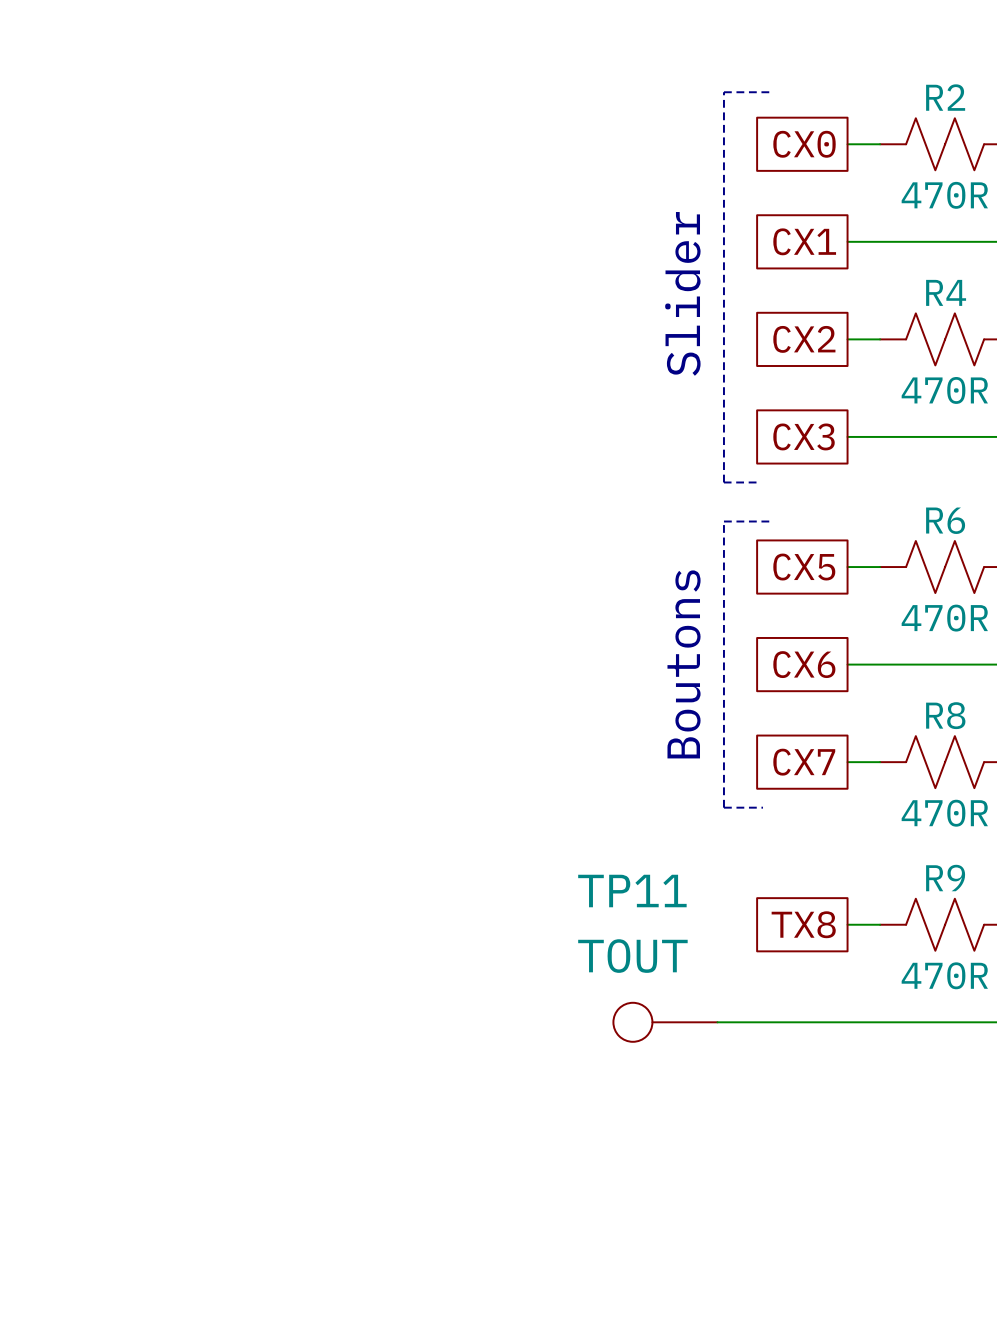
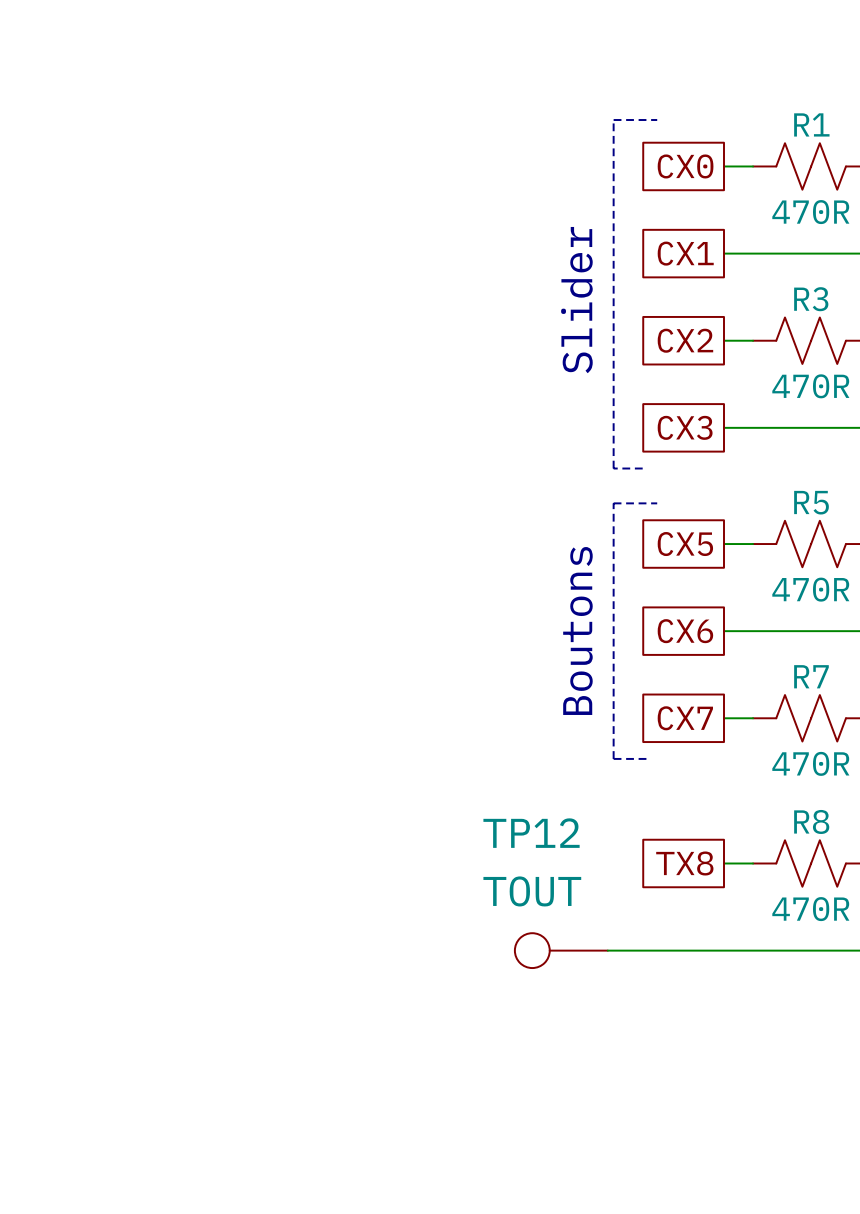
R2 name: R2 (945, 97) -> R1 (811, 124)
R4 name: R4 (946, 292) -> R3 (811, 299)
R6 name: R6 (945, 520) -> R5 (811, 502)
R8 name: R8 (945, 715) -> R7 (811, 676)
R9 name: R9 (945, 878) -> R8 (811, 821)
TP11 name: TP11 (632, 891) -> TP12 (531, 833)

